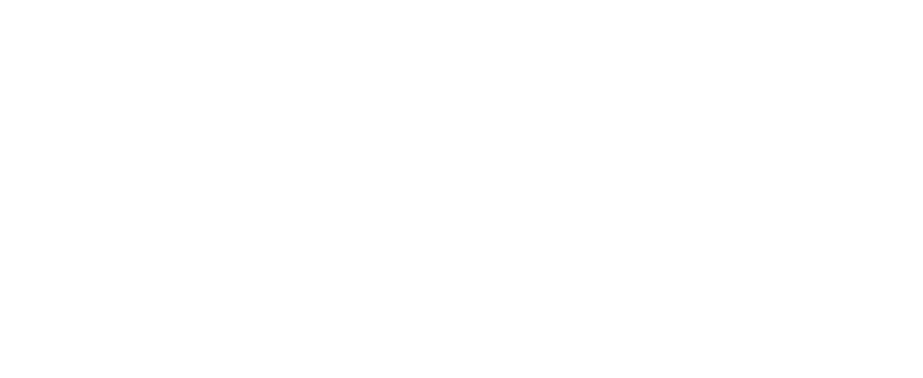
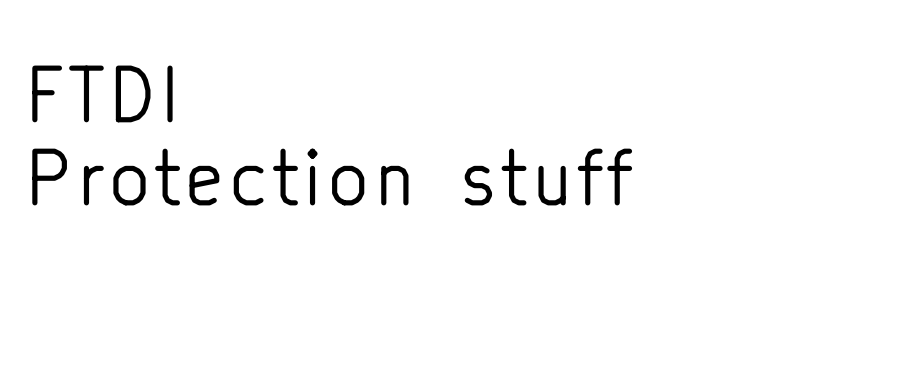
text: none -> FTDI (102, 93)
text: none -> Protection stuff (332, 177)

